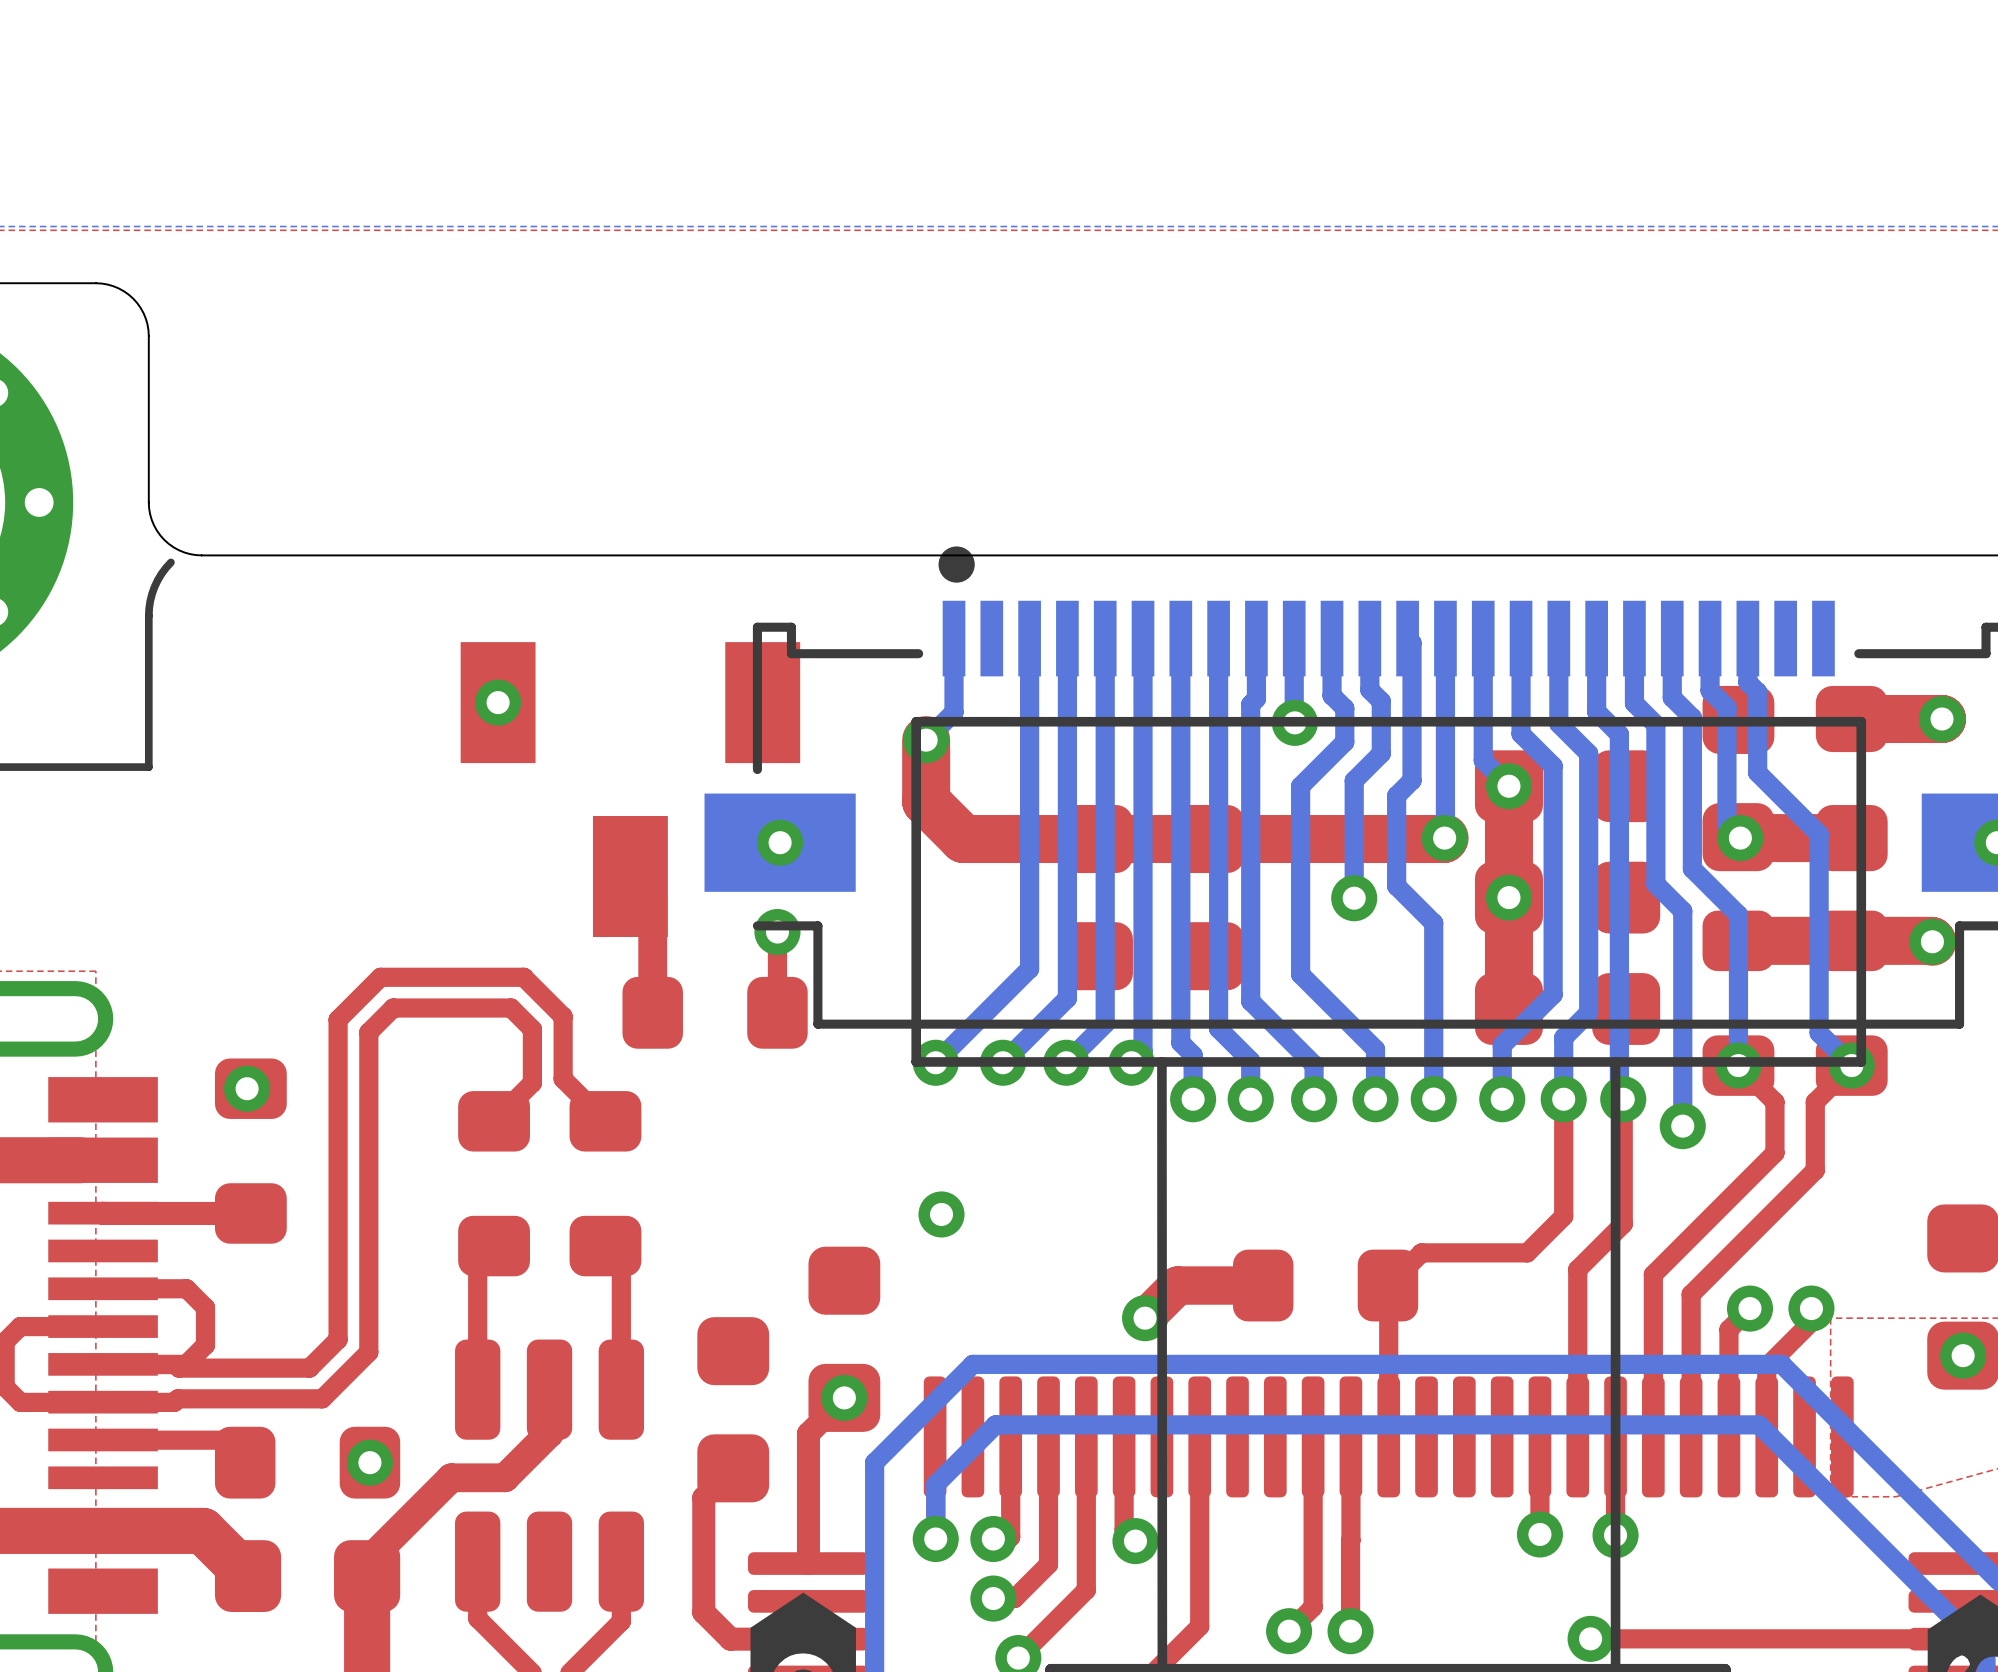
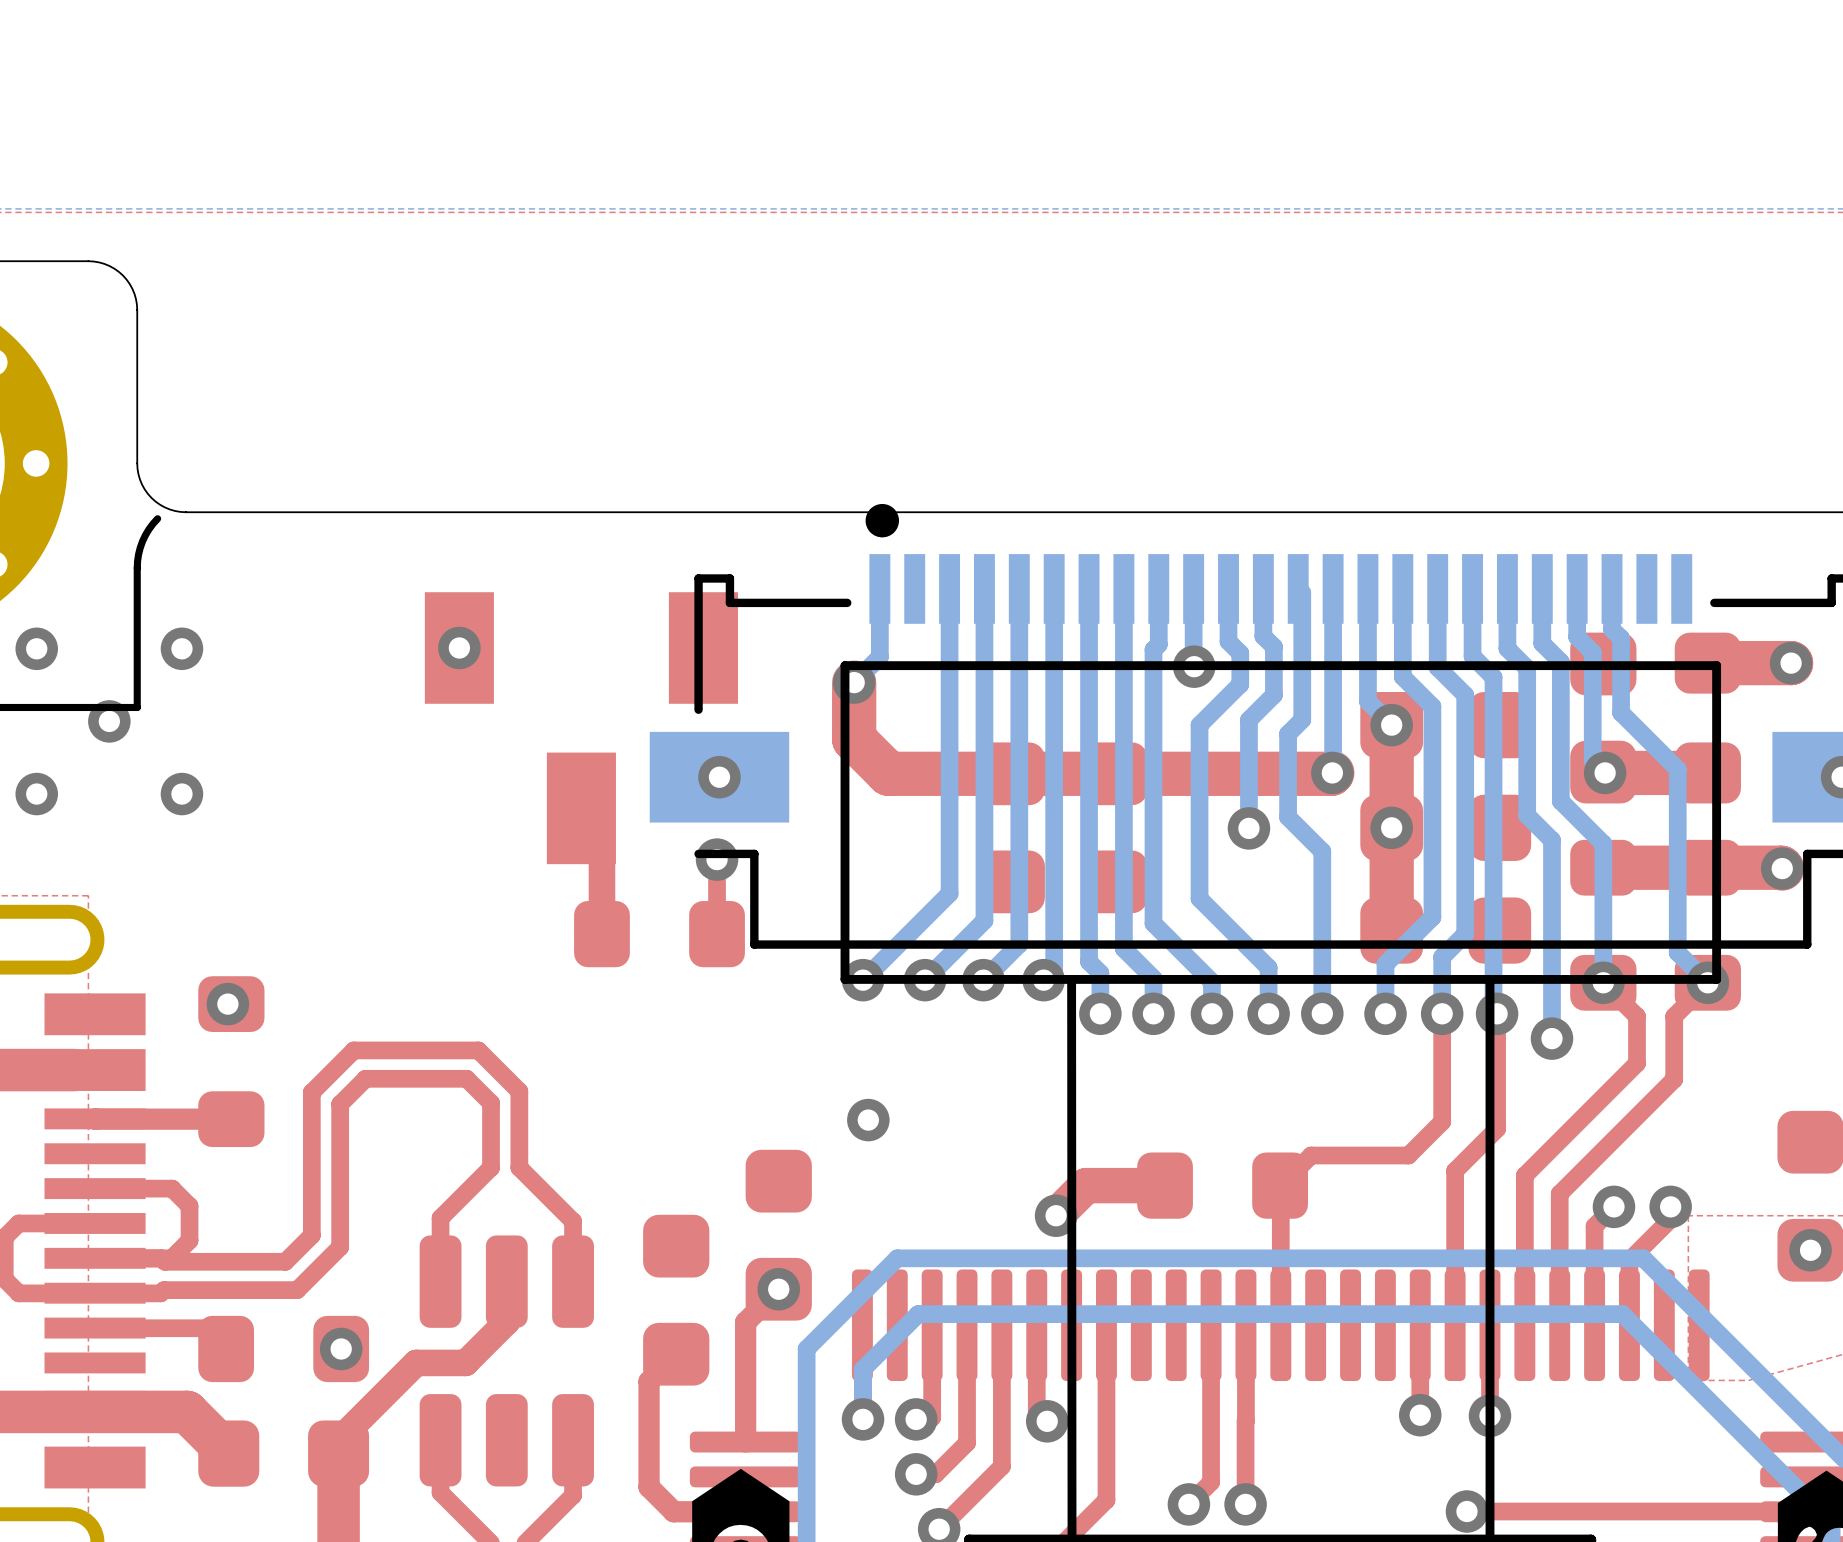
via: none -> (36, 648)
via: none -> (181, 648)
via: none -> (109, 721)
via: none -> (36, 794)
via: none -> (181, 794)
top track: (494, 1120) (532, 1082) (532, 1029) (511, 1008) (393, 1008) (368, 1032) (368, 1197) -> none
top track: (605, 1120) (563, 1078) (563, 1016) (523, 977) (380, 977) (338, 1019) (338, 1184) -> (573, 1221) (519, 1167) (519, 1091) (478, 1050) (353, 1050) (311, 1092)
part: (494, 1183) -> none
part: (605, 1183) -> none
top track: (605, 1245) (621, 1261) (621, 1324) -> none
top track: (477, 1262) (477, 1320) -> (340, 1104) (365, 1078) (466, 1078) (491, 1103) (491, 1167) (440, 1218)

